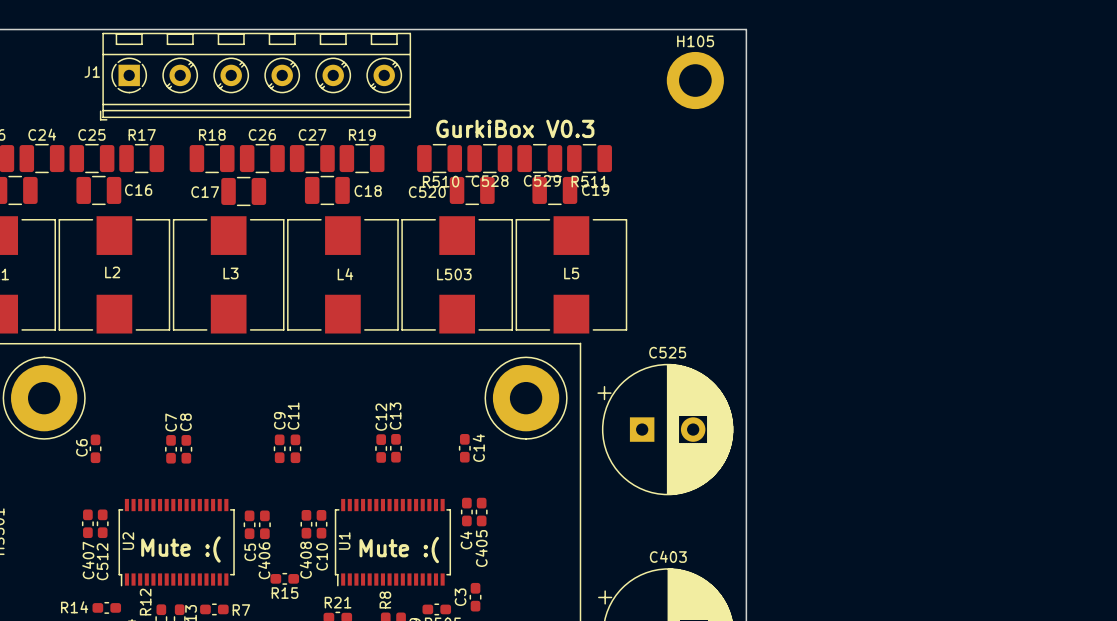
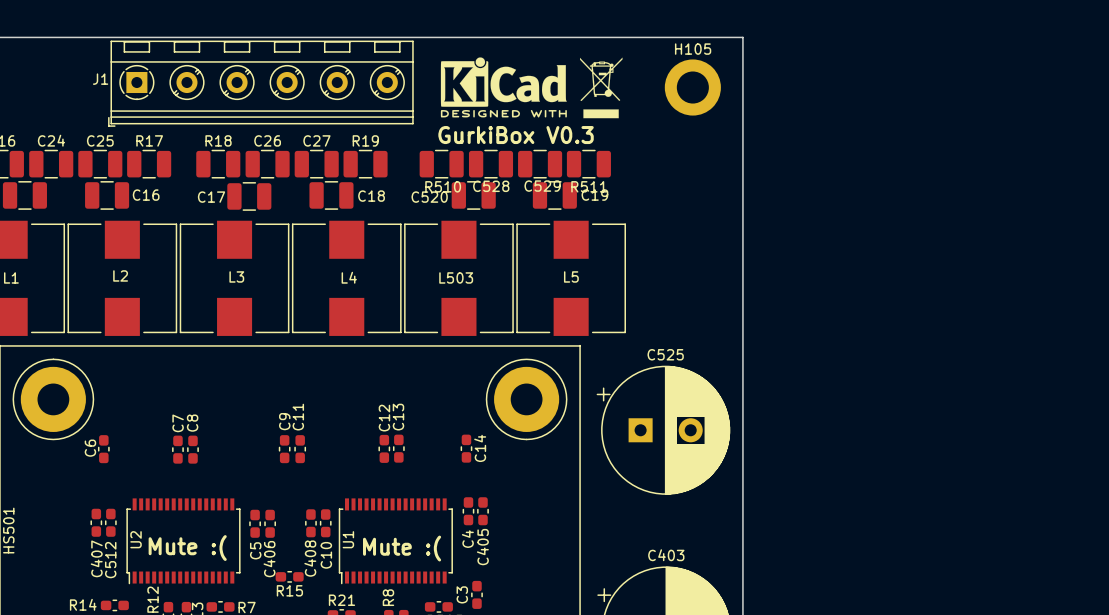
drawing: none -> [440, 57, 567, 118]
drawing: none -> [579, 57, 623, 119]

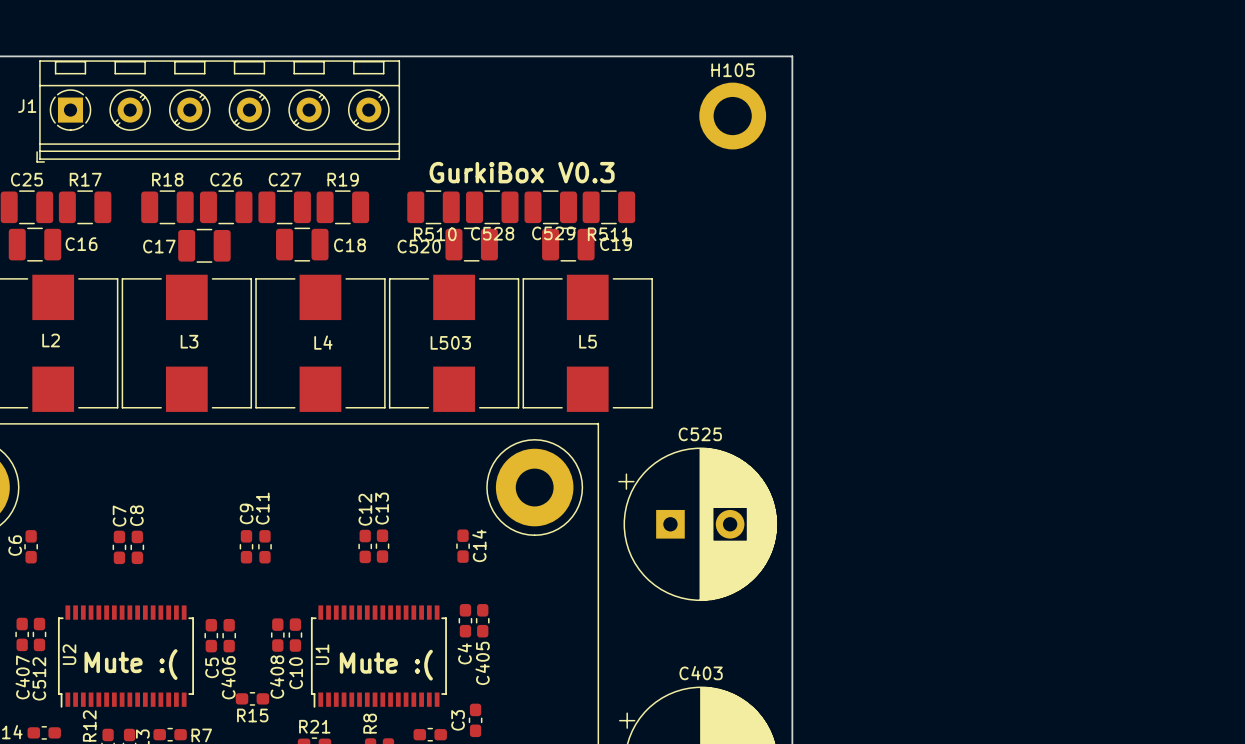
drawing: [440, 57, 567, 118] -> none
drawing: [579, 57, 623, 119] -> none

